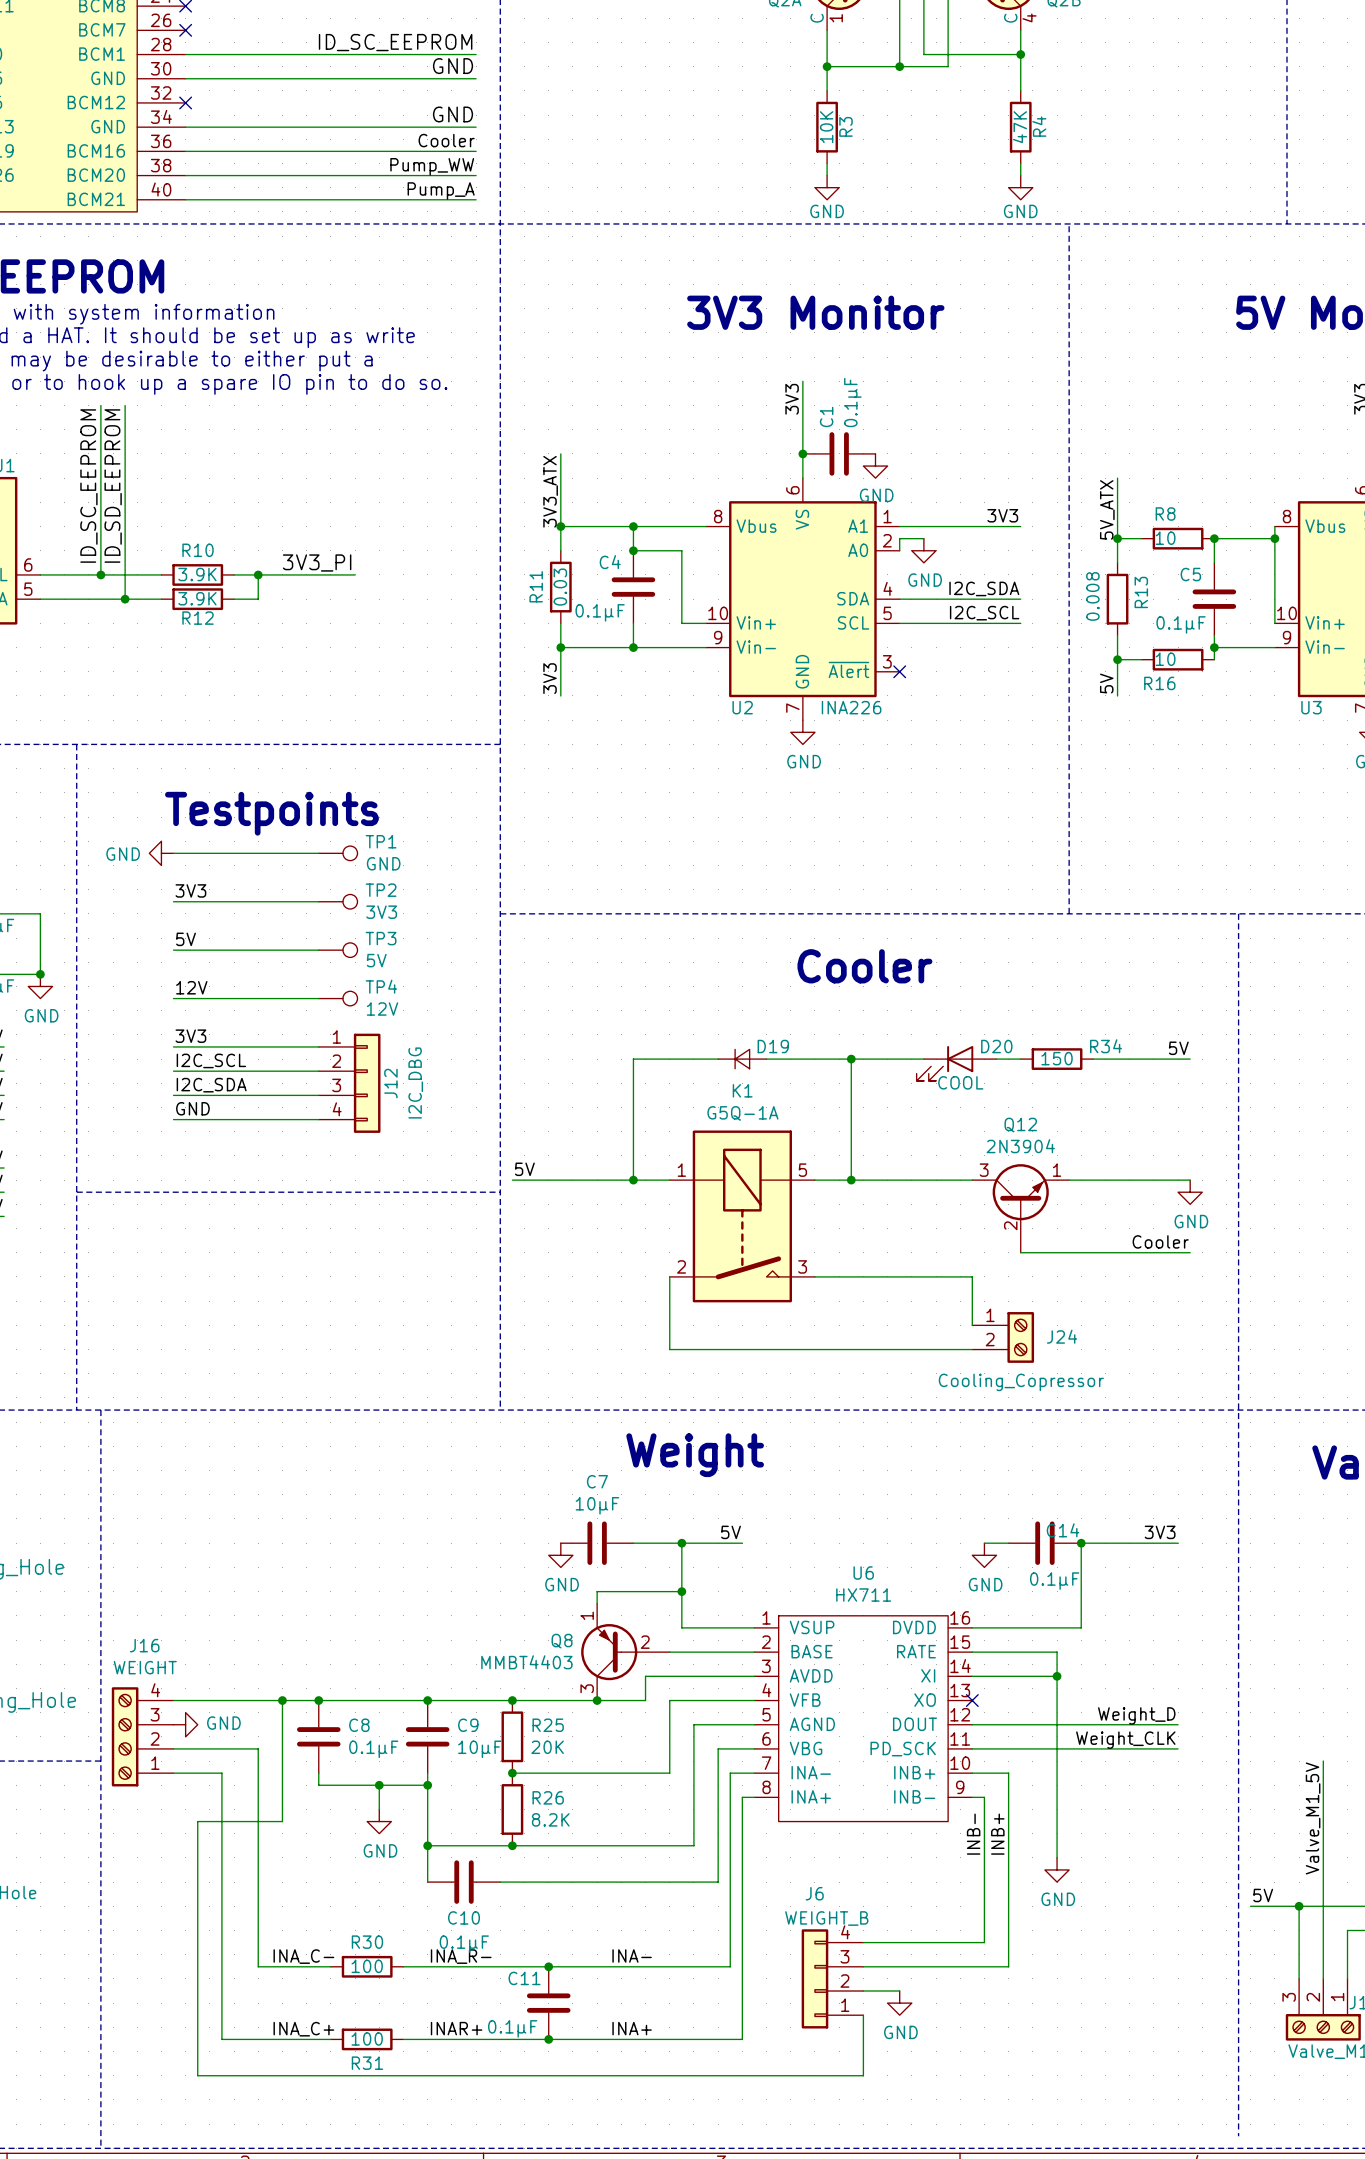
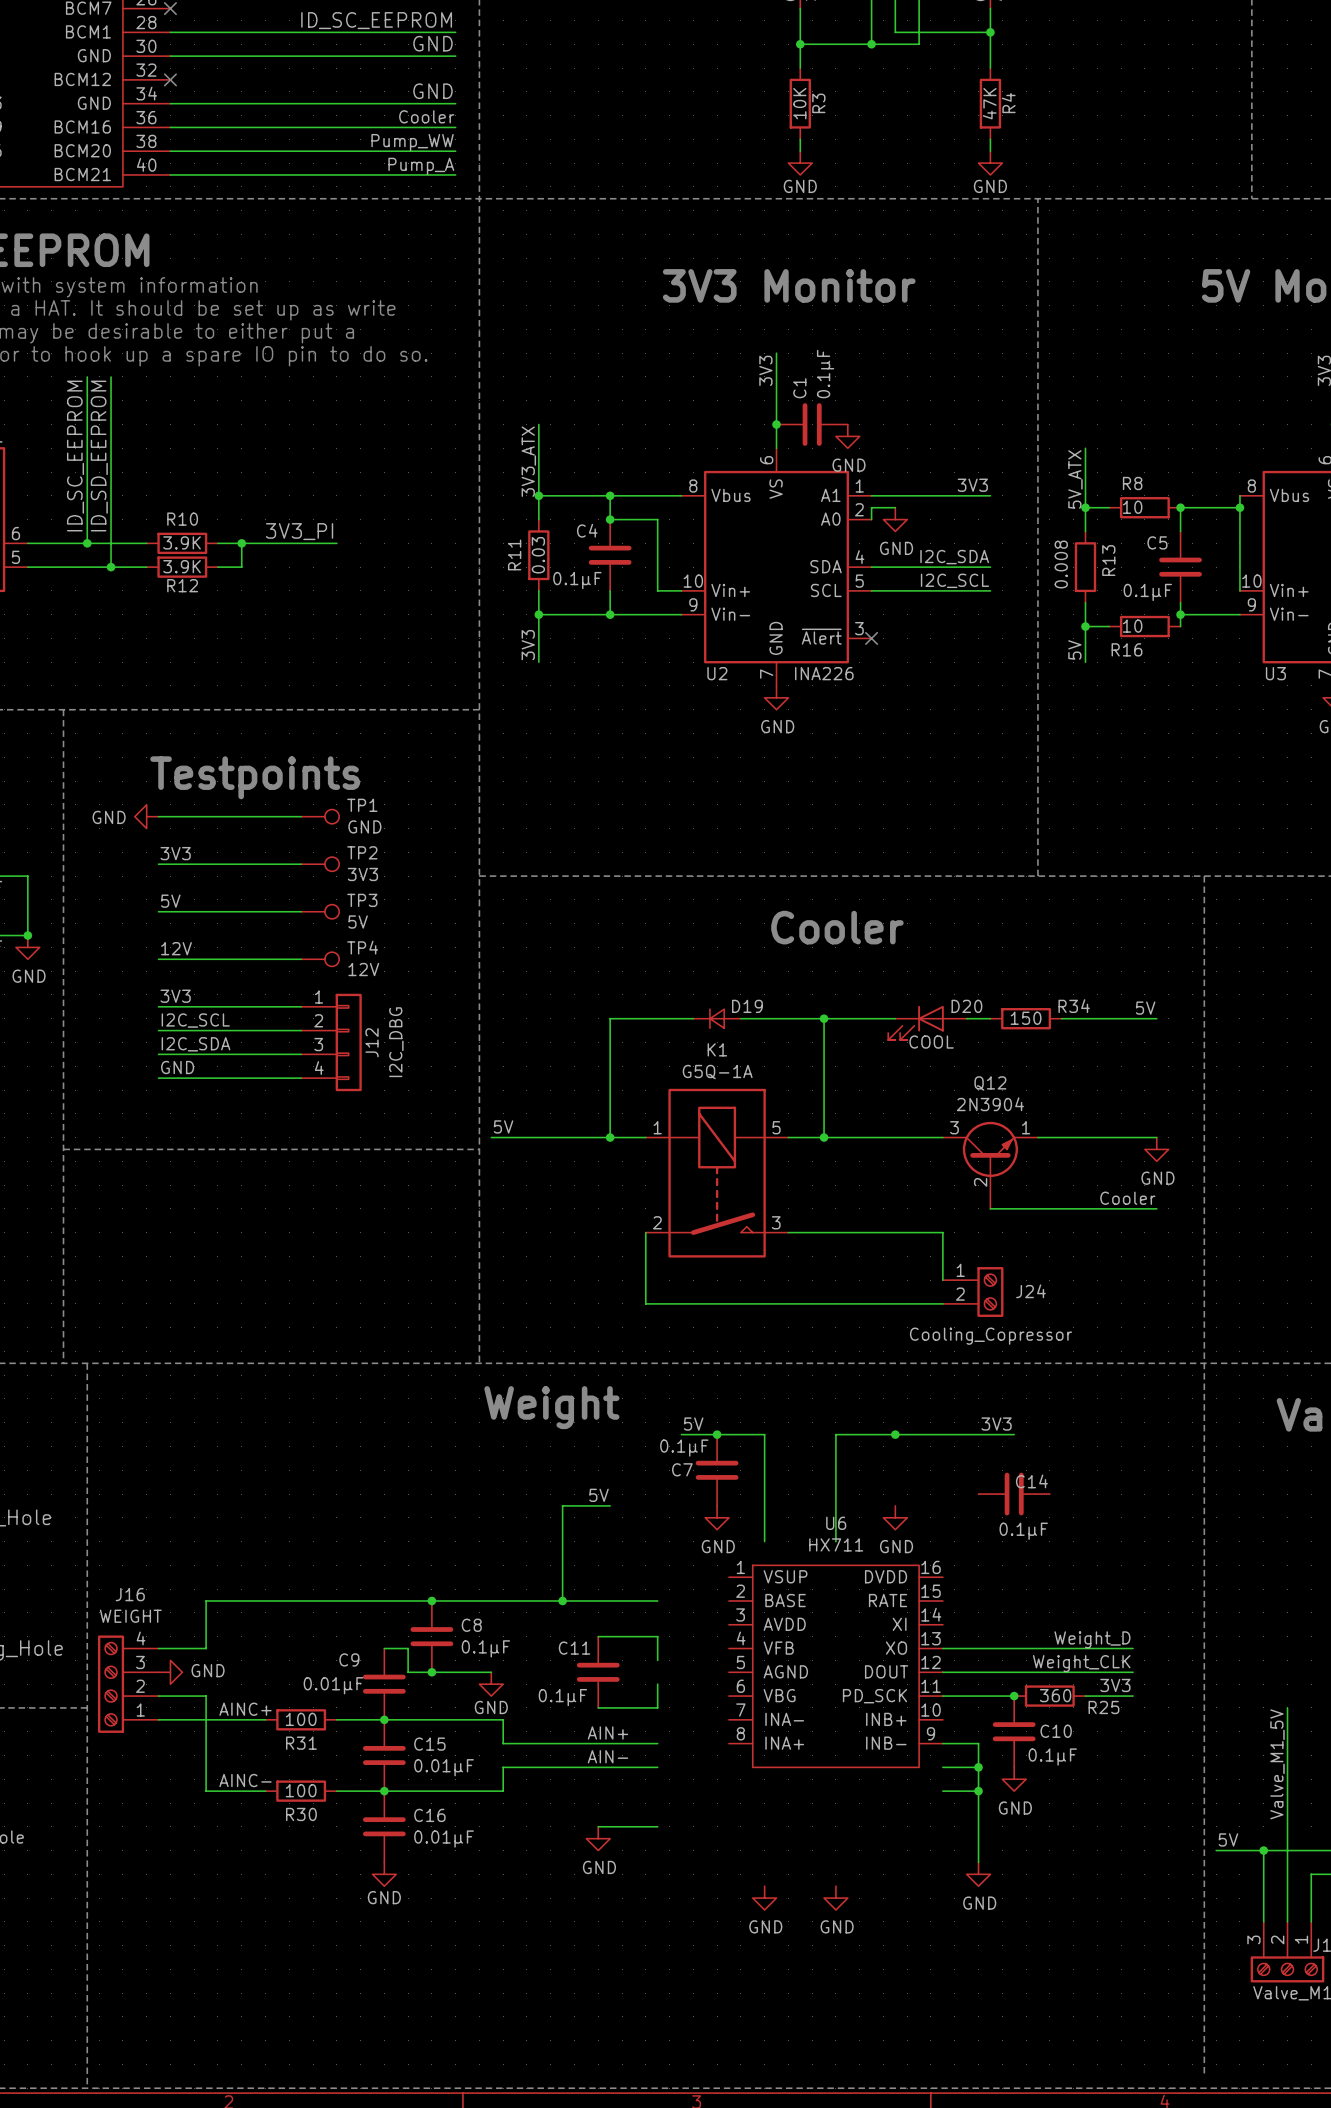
text position: Weight (695, 1455) -> Weight (551, 1407)
label: none -> 5V (693, 1424)
label: none -> 3V3 (996, 1424)
C7 name position: C7 (597, 1481) -> C7 (682, 1469)
wire: none -> (681, 1434) (764, 1434) (764, 1541)
junction: none -> (717, 1434)
junction: none -> (895, 1434)
wire: none -> (1014, 1434) (835, 1434) (835, 1541)
C7 value: 10μF (597, 1505) -> 0.1μF (684, 1448)
label: 5V (731, 1532) -> none
label: 3V3 (1160, 1532) -> none
C7 rotation: 0° (597, 1543) -> 90° clockwise (717, 1470)
C7 position: (597, 1543) -> (717, 1470)
wire: (633, 1543) (742, 1543) -> none
wire: (681, 1543) (681, 1627) (754, 1627) -> none
junction: (681, 1543) -> none
wire: (984, 1543) (1008, 1543) -> none
junction: (1081, 1543) -> none
wire: (1178, 1543) (1081, 1543) (1081, 1627) (972, 1627) -> none
label: none -> 5V (599, 1495)
power symbol: GND (560, 1555) -> none
wire: none -> (610, 1505) (562, 1505) (562, 1600)
power symbol position: GND (984, 1555) -> GND (895, 1517)
power symbol: none -> GND (717, 1517)
wire: (681, 1591) (597, 1591) (597, 1603) -> none
junction: (681, 1591) -> none
junction: none -> (431, 1600)
junction: none -> (562, 1600)
Q8: MMBT4403 (625, 1652) -> none
wire: (681, 1652) (754, 1652) -> none
wire: (972, 1652) (1057, 1652) (1057, 1857) -> none
wire: (754, 1676) (645, 1676) (645, 1700) (427, 1700) -> (491, 1672) (408, 1672) (408, 1648)
wire: (972, 1676) (1057, 1676) -> none
junction: (1057, 1676) -> none
wire: none -> (598, 1636) (657, 1636) (657, 1660)
wire: (221, 1700) (403, 1700) -> (206, 1648) (206, 1600) (645, 1600)
wire: (282, 1700) (282, 1821) (197, 1821) (197, 2075) (863, 2075) (863, 2015) -> none
junction: (282, 1700) -> none
junction: (318, 1700) -> none
junction: (427, 1700) -> none
junction: (512, 1700) -> none
junction: (597, 1700) -> none
wire: (754, 1700) (669, 1700) (669, 1773) (524, 1773) -> (657, 1743) (503, 1743) (503, 1719)
wire: none -> (942, 1648) (1133, 1648)
no-connect mark: (972, 1700) -> none
label position: Weight_D (1136, 1715) -> Weight_D (1092, 1639)
junction: none -> (431, 1672)
wire: (754, 1724) (693, 1724) (693, 1845) (524, 1845) -> (657, 1767) (503, 1767) (503, 1791)
wire: (1165, 1724) (1178, 1724) -> none
C9 name position: C9 (468, 1725) -> C9 (349, 1659)
R25 name position: R25 (548, 1725) -> R25 (1103, 1707)
C8 position: (318, 1736) -> (431, 1636)
C9 position: (427, 1736) -> (384, 1684)
R25 rotation: 0° (512, 1736) -> 90° clockwise (1049, 1696)
R25 position: (512, 1736) -> (1049, 1696)
power symbol: none -> GND (491, 1684)
wire: none -> (657, 1684) (657, 1707) (598, 1707)
label: none -> 3V3 (1115, 1685)
label position: Weight_CLK (1125, 1740) -> Weight_CLK (1081, 1663)
R25 value: 20K (547, 1747) -> 360 (1055, 1695)
wire: (221, 1748) (258, 1748) (258, 1966) (330, 1966) -> (206, 1696) (206, 1719) (265, 1719)
wire: (754, 1748) (718, 1748) (718, 1882) (681, 1882) -> none
wire: (1044, 1748) (1117, 1748) -> none
junction: none -> (1014, 1696)
wire: (1165, 1748) (1178, 1748) -> none
C9 value: 10μF (479, 1749) -> 0.01μF (333, 1685)
label: none -> AINC+ (245, 1709)
wire: (318, 1773) (318, 1785) (427, 1785) -> none
wire: none -> (336, 1719) (491, 1719)
junction: none -> (384, 1719)
wire: (427, 1773) (427, 1882) -> none
junction: (512, 1773) -> none
wire: (754, 1773) (730, 1773) (730, 1966) (403, 1966) -> none
wire: (972, 1773) (1008, 1773) (1008, 1797) -> (954, 1743) (978, 1743)
wire: (379, 1785) (379, 1809) -> none
junction: (379, 1785) -> none
junction: (427, 1785) -> none
label: none -> AIN+ (607, 1732)
wire: (754, 1797) (742, 1797) (742, 2039) (403, 2039) -> none
wire: (984, 1797) (984, 1942) (863, 1942) -> none
C15: none -> 0.01μF (384, 1755)
R26: 8.2K (512, 1809) -> none
label: none -> AIN- (607, 1756)
power symbol: GND (379, 1821) -> none
wire: none -> (942, 1767) (978, 1767)
junction: none -> (978, 1767)
label: none -> AINC- (245, 1780)
label: INB- (973, 1834) -> none
label: INB+ (997, 1834) -> none
wire: (221, 1845) (221, 2039) (330, 2039) -> (206, 1791) (265, 1791)
wire: none -> (336, 1791) (408, 1791)
junction position: (427, 1845) -> (384, 1791)
junction: (512, 1845) -> none
junction: none -> (978, 1791)
power symbol position: GND (1057, 1869) -> GND (1014, 1779)
C16: none -> 0.01μF (384, 1826)
C10 rotation: 0° (463, 1882) -> 90° clockwise (1014, 1731)
C10 position: (463, 1882) -> (1014, 1731)
wire: (500, 1882) (621, 1882) -> none
power symbol: none -> GND (598, 1838)
C10 name position: C10 (463, 1917) -> C10 (1056, 1731)
wire: (1008, 1918) (1008, 1966) (863, 1966) -> none
power symbol: none -> GND (384, 1874)
power symbol: none -> GND (978, 1874)
R30 name position: R30 (367, 1942) -> R30 (301, 1814)
C10 value position: 0.1μF (464, 1944) -> 0.1μF (1052, 1757)
power symbol: none -> GND (764, 1898)
power symbol: none -> GND (835, 1898)
label: INA- (632, 1955) -> none
label: INA_C- (303, 1956) -> none
label: INA_R- (461, 1956) -> none
R30 position: (367, 1966) -> (301, 1791)
junction: (548, 1966) -> none
J6: WEIGHT_B (832, 1978) -> none
wire: (863, 1991) (899, 1991) -> (942, 1791) (978, 1791)
C11 position: (548, 2003) -> (598, 1672)
power symbol: GND (899, 2003) -> none
label: INAR+ (456, 2028) -> none
label: INA+ (632, 2028) -> none
label: INA_C+ (303, 2029) -> none
R31 position: (367, 2039) -> (301, 1719)
junction: (548, 2039) -> none

